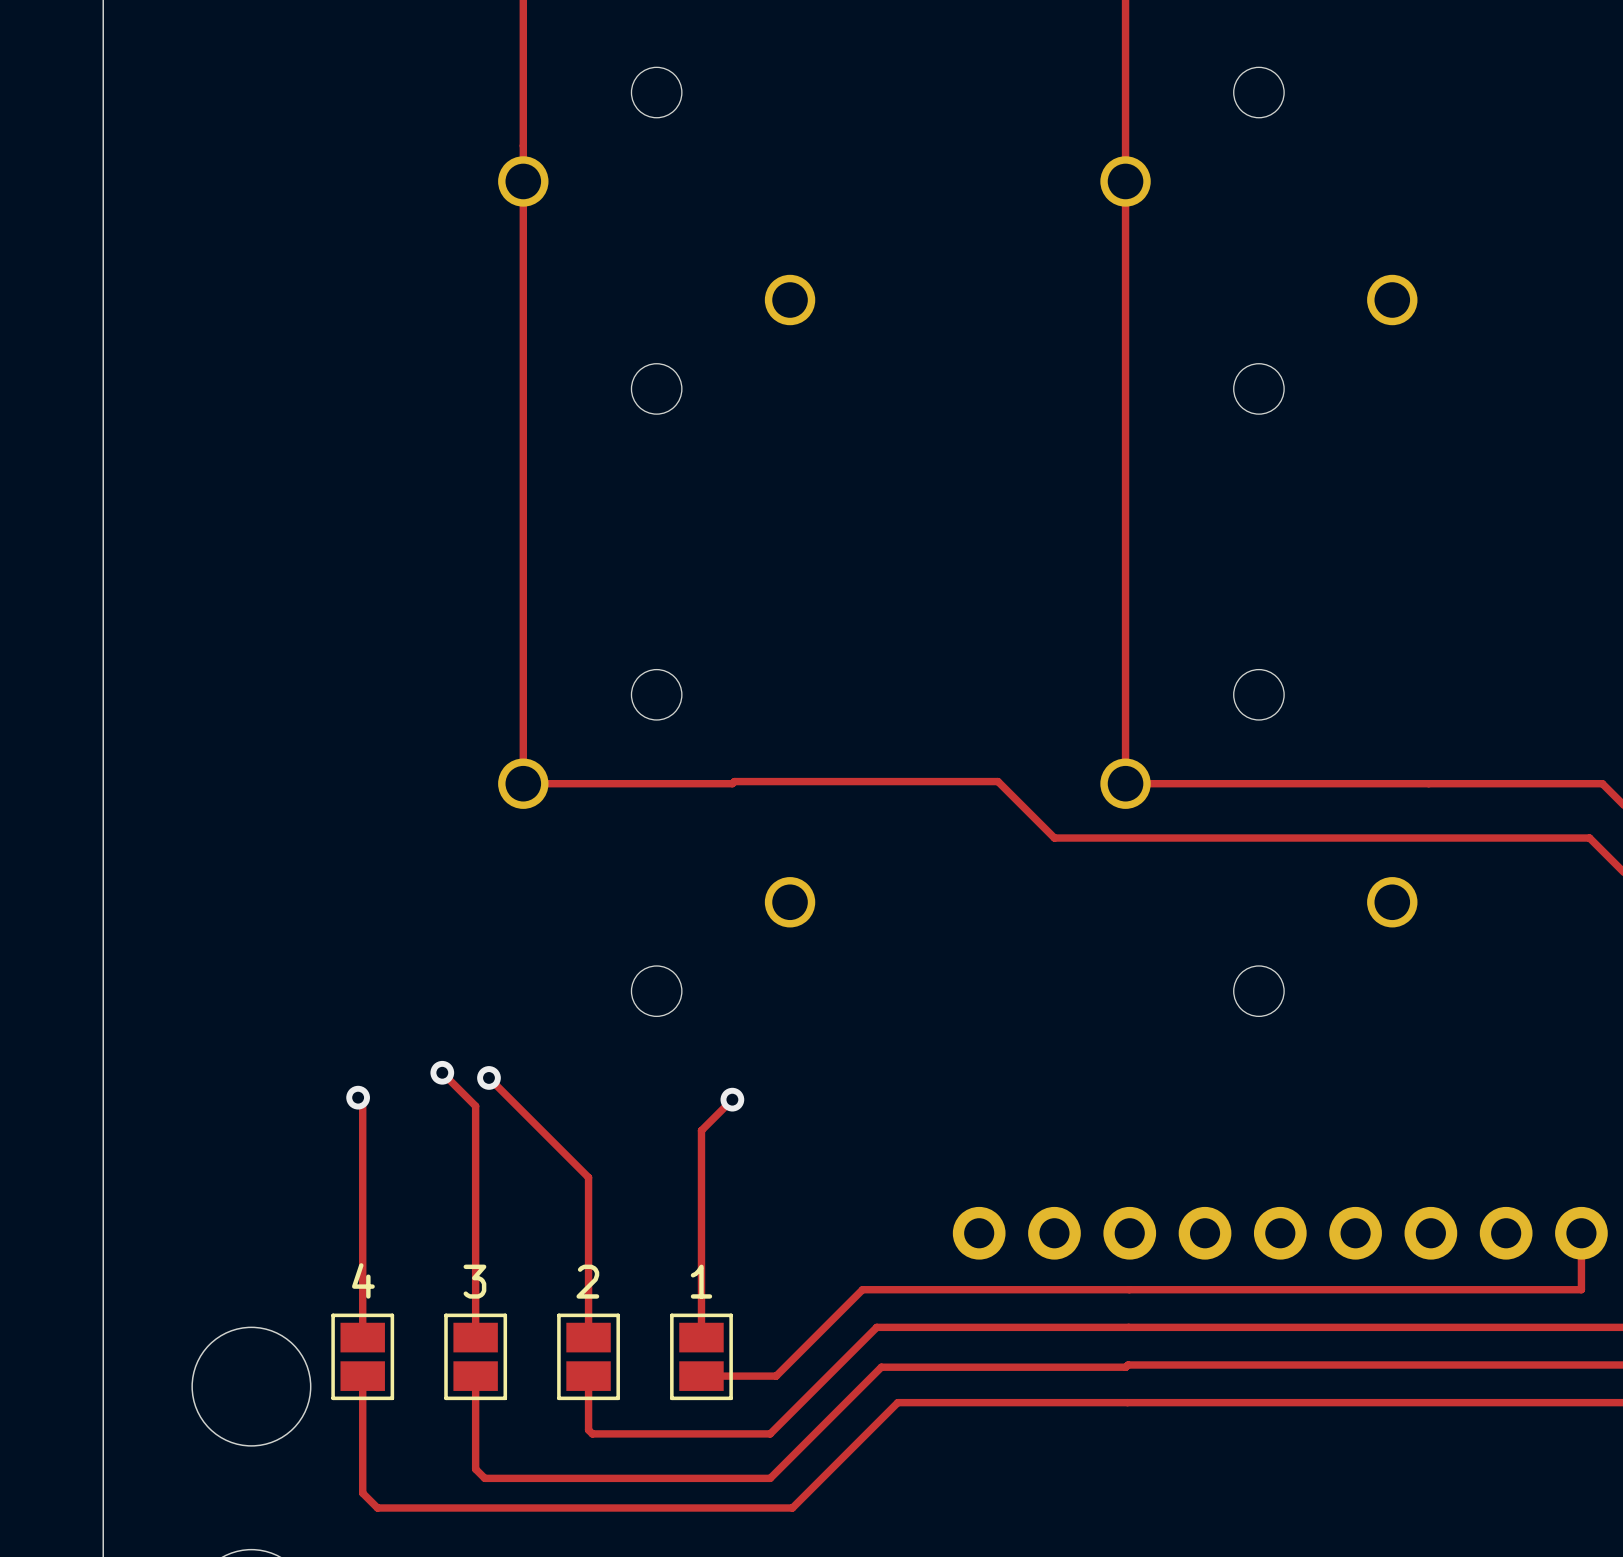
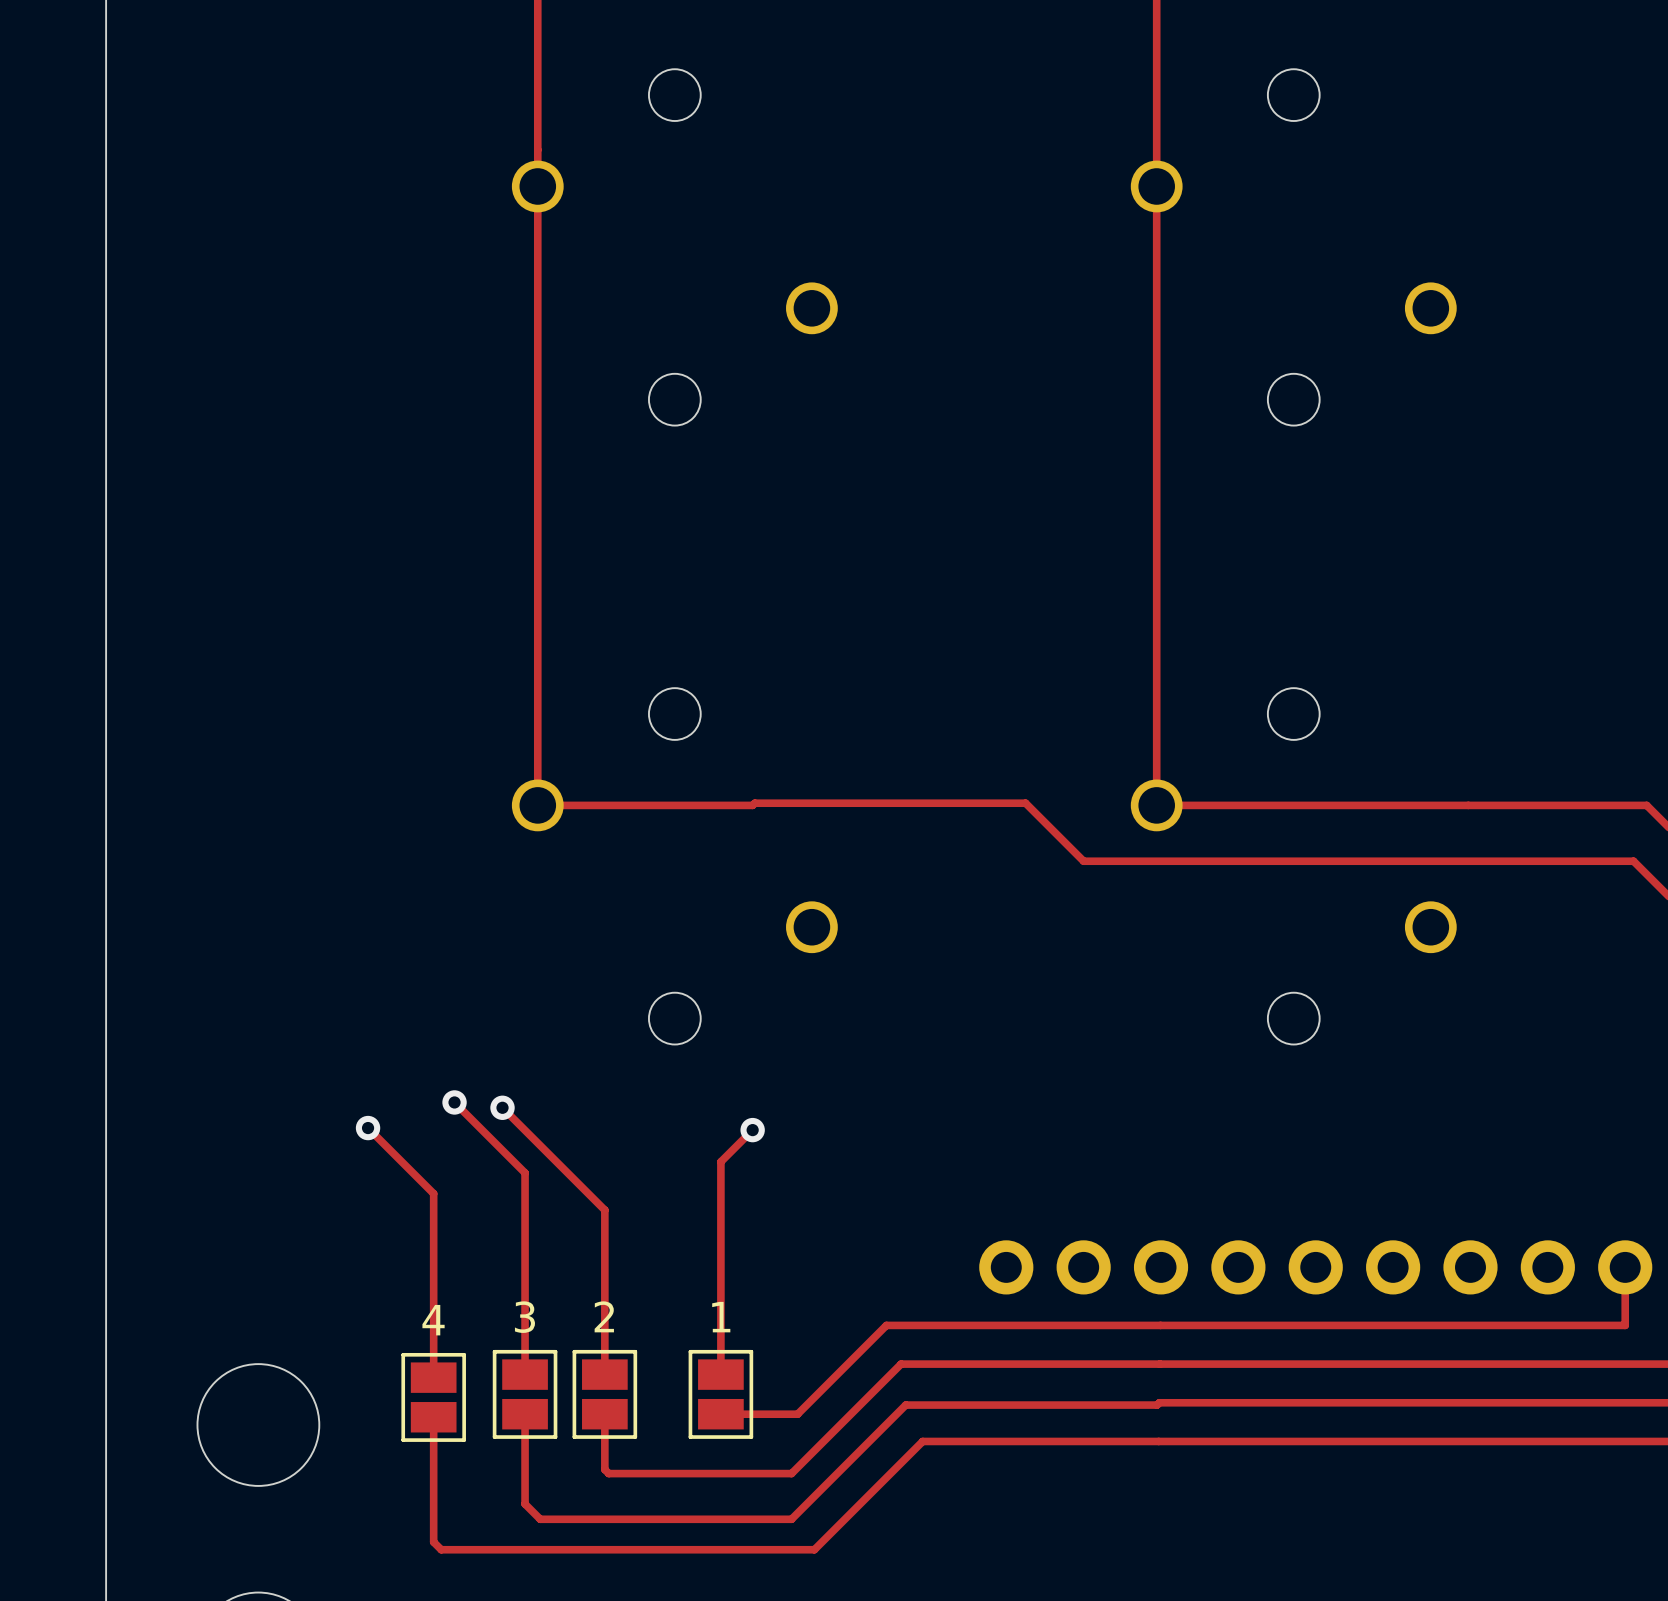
track: (362, 1102) (362, 1337) -> (372, 1132) (433, 1193) (433, 1377)
track: (475, 1106) (475, 1337) -> (488, 1136) (525, 1172) (525, 1374)
4 position: (362, 1356) -> (433, 1397)
3 position: (475, 1356) -> (525, 1394)
track: (362, 1376) (362, 1493) (377, 1508) (429, 1508) -> (433, 1417) (433, 1542) (441, 1549)
track: (475, 1376) (475, 1469) (484, 1478) (525, 1478) -> (525, 1414) (525, 1504) (540, 1519)

